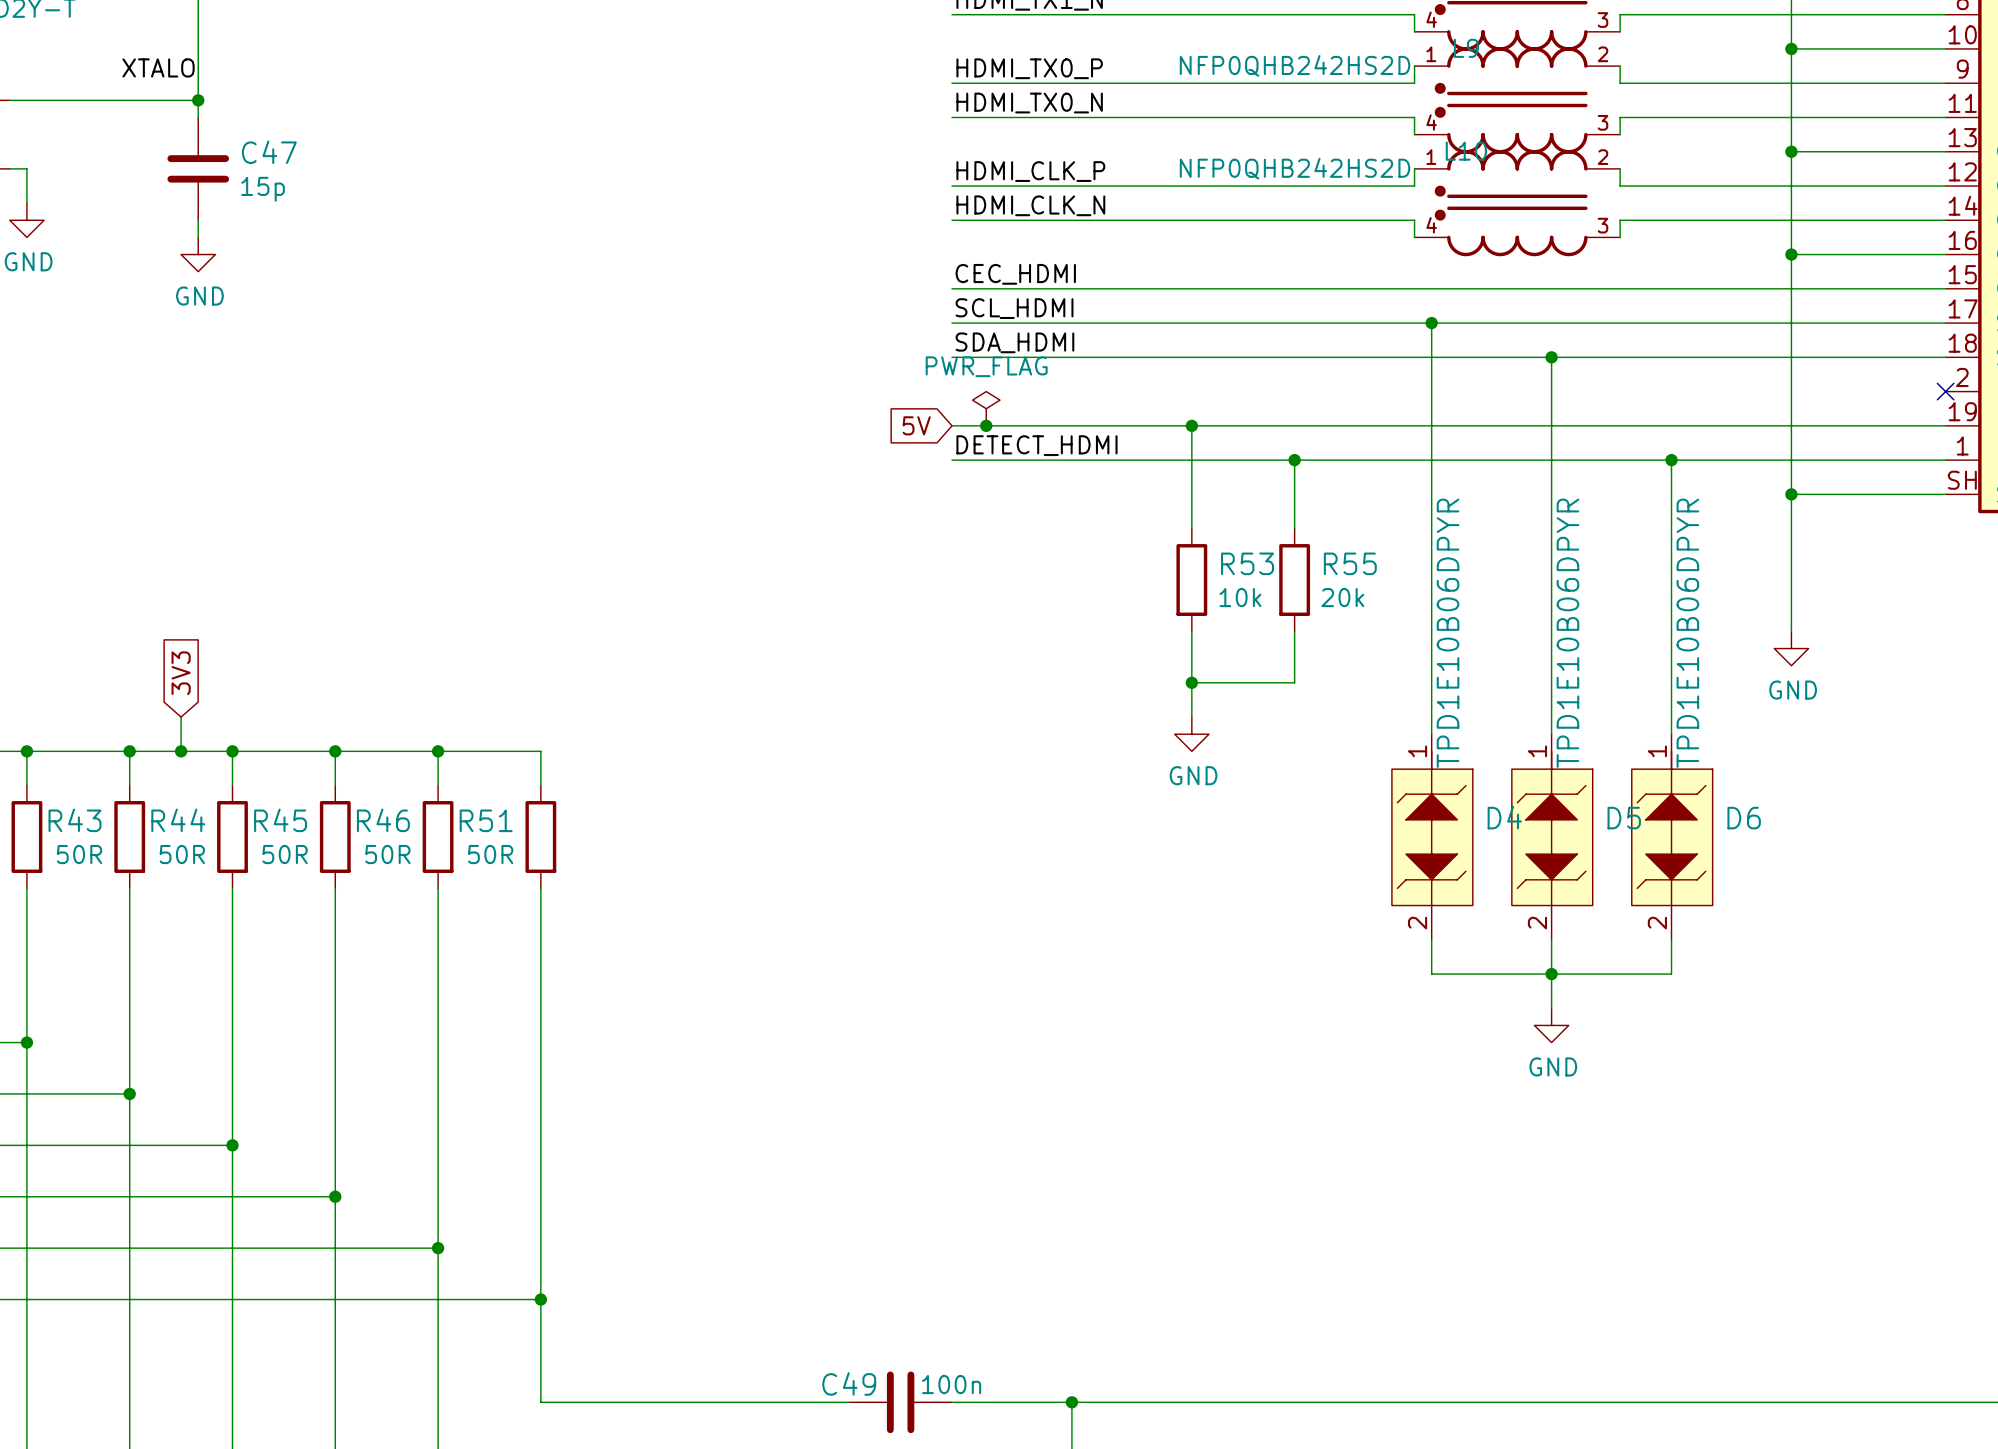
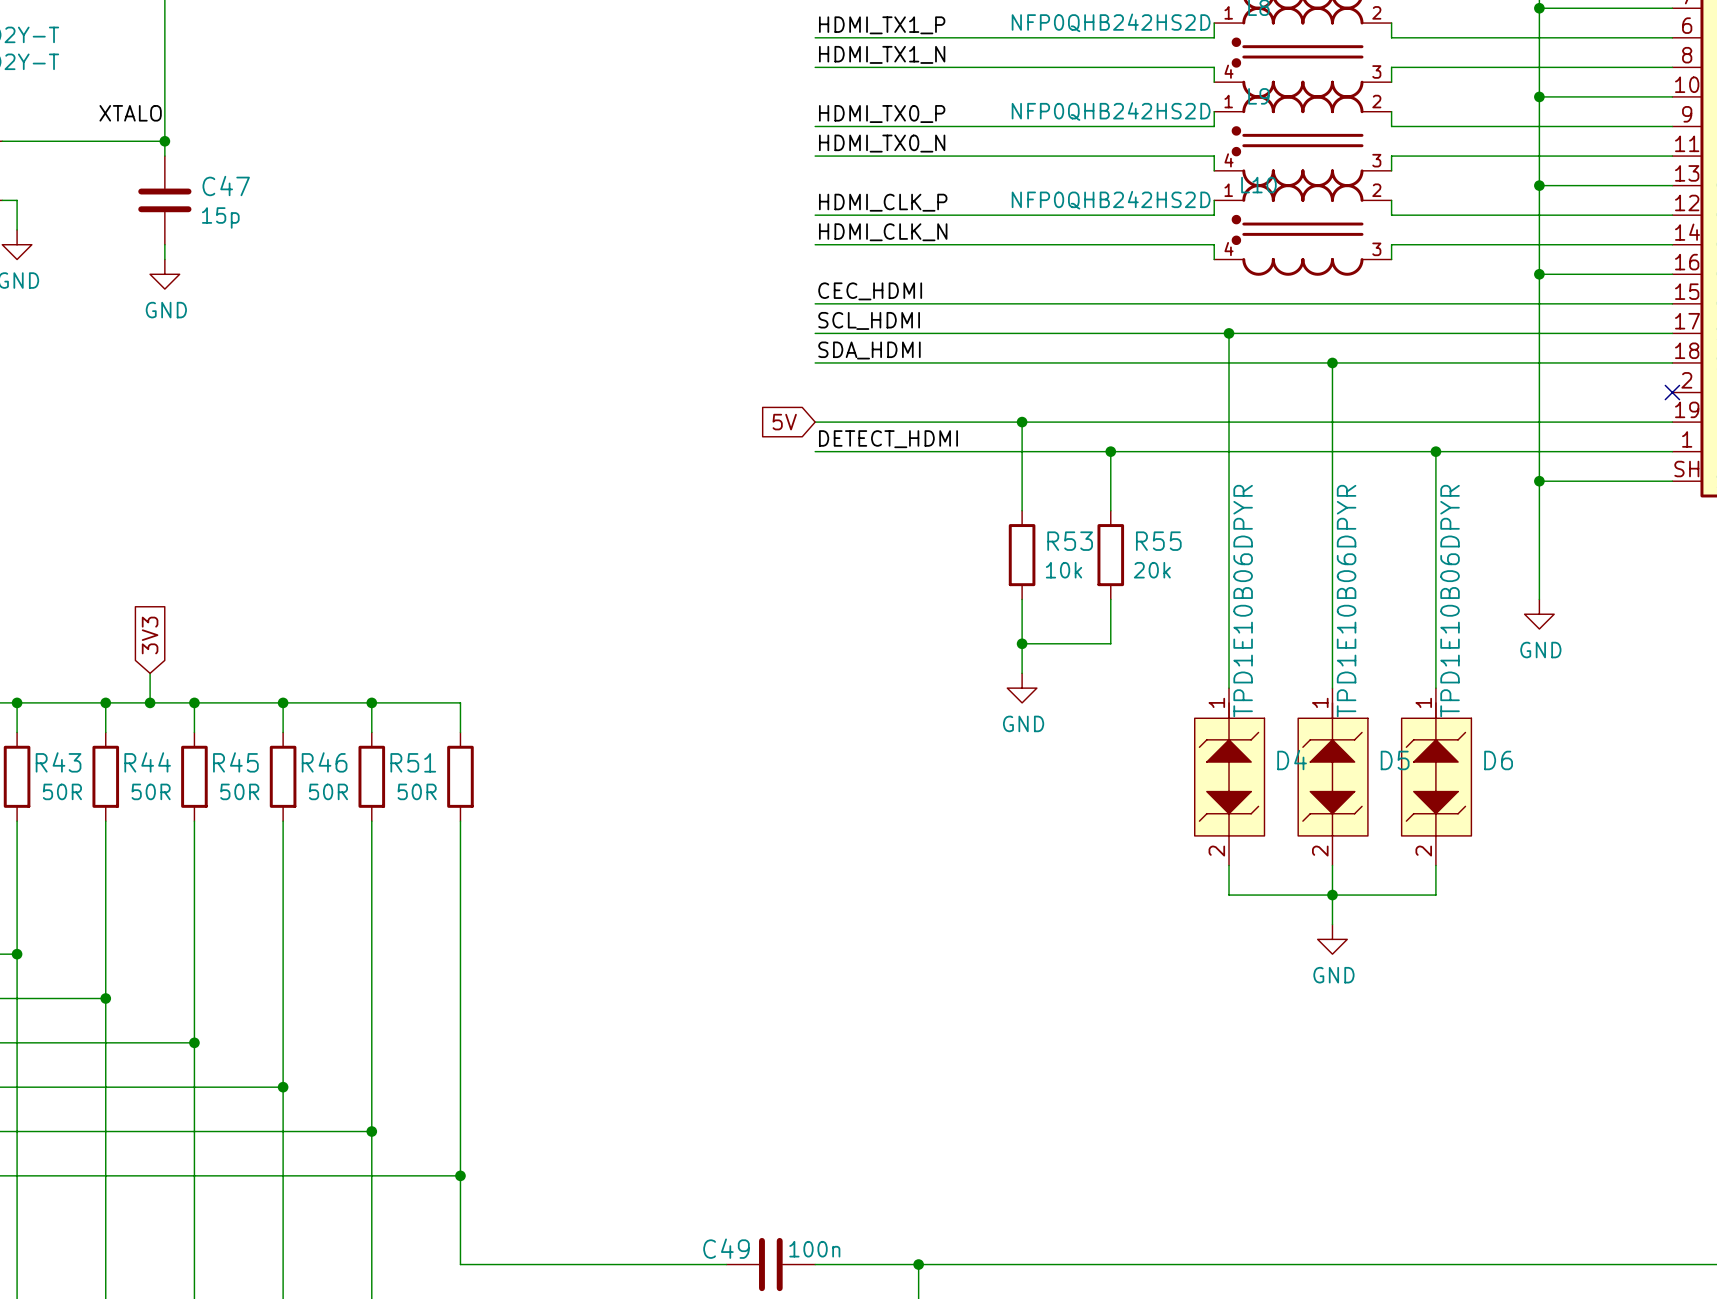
power symbol: PWR_FLAG (986, 408) -> none
junction: (986, 425) -> none

